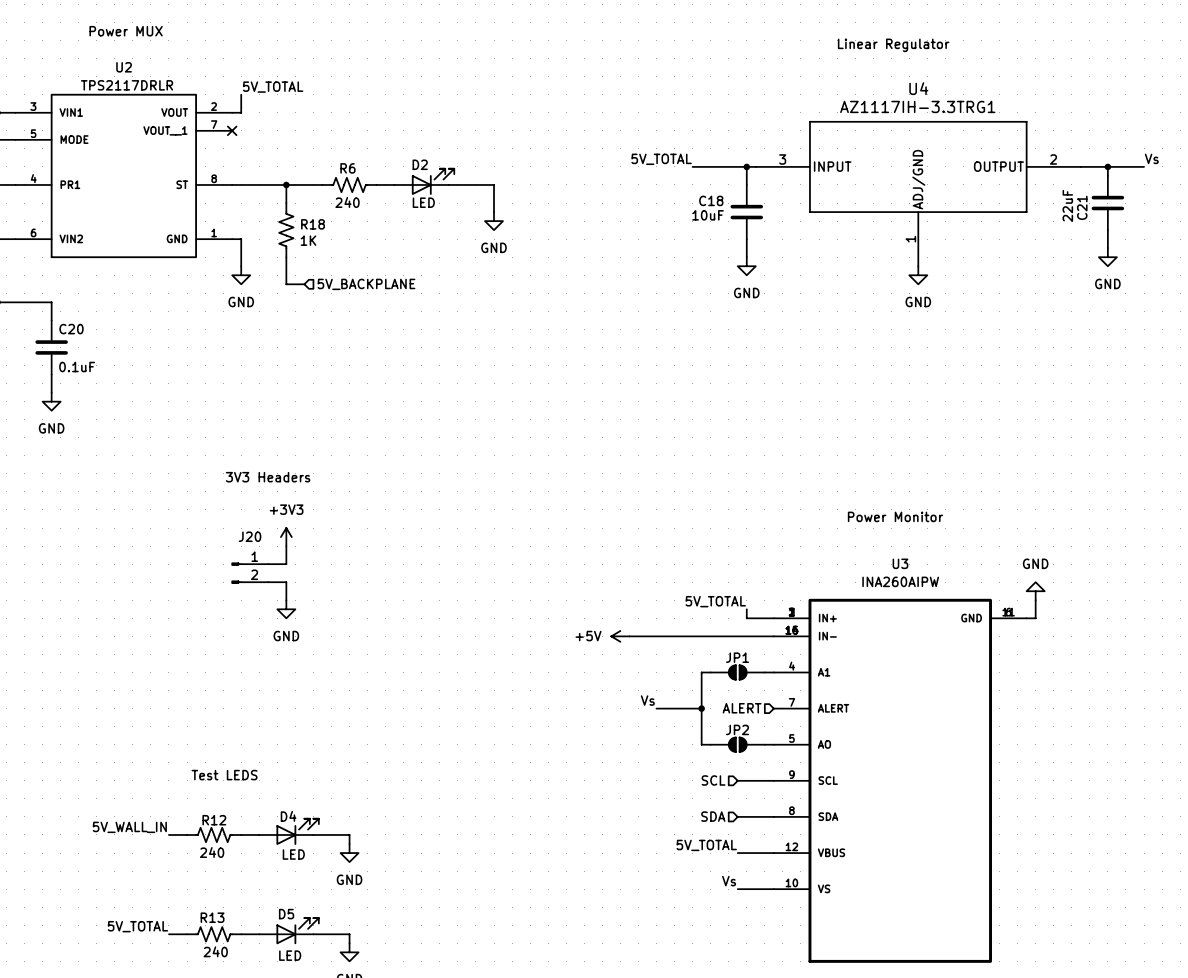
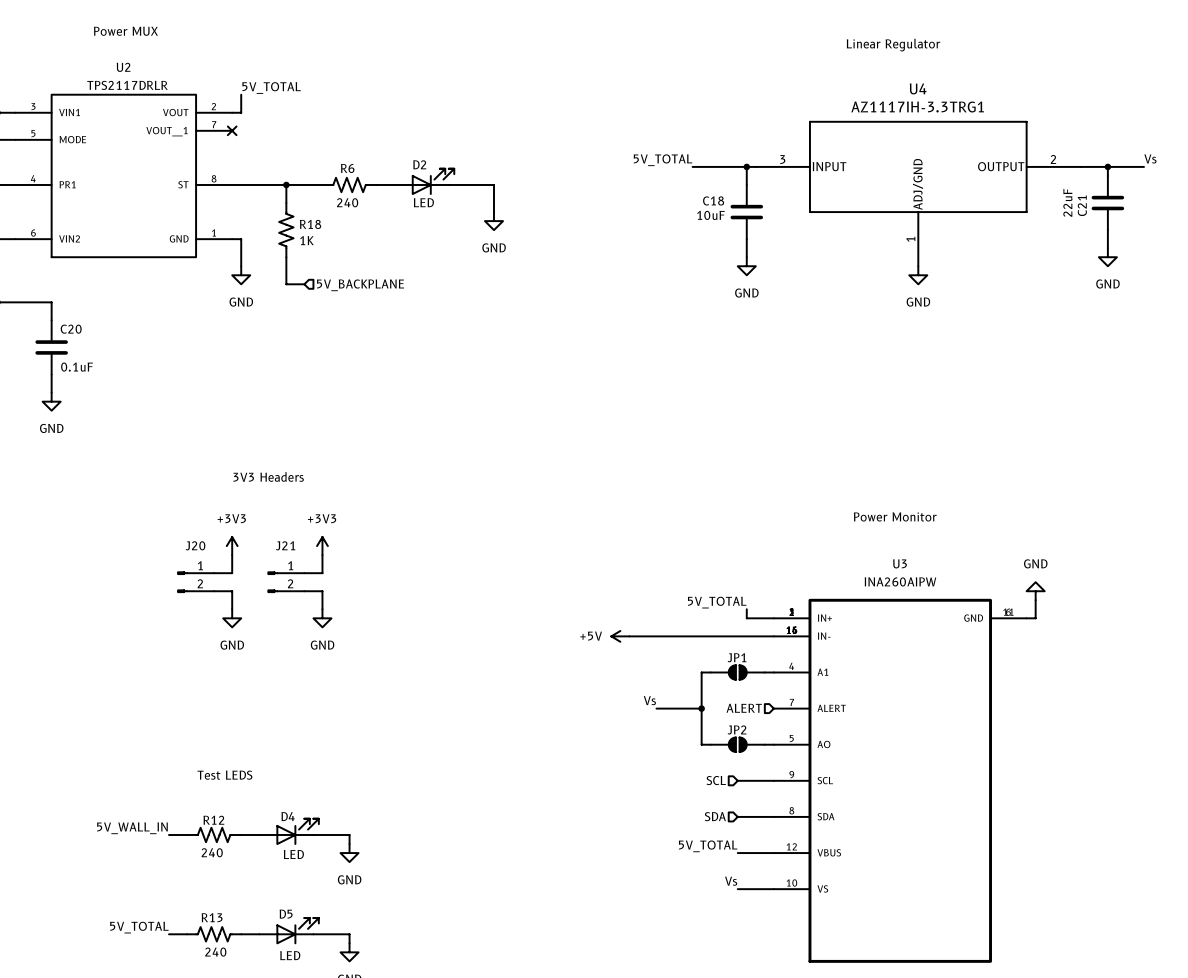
power symbol: +3V3 (286, 537) -> none
power symbol: none -> +3V3 (232, 546)
wire: (286, 546) (286, 564) (268, 564) -> (322, 555) (322, 573) (304, 573)
power symbol: none -> +3V3 (322, 546)
wire: none -> (232, 555) (232, 573) (214, 573)
J20 position: (249, 573) -> (195, 582)
wire: (268, 582) (286, 582) (286, 600) -> (304, 591) (322, 591) (322, 609)
J21: none -> (286, 582)
wire: none -> (214, 591) (232, 591) (232, 609)
power symbol: GND (286, 609) -> none
power symbol: none -> GND (232, 618)
power symbol: none -> GND (322, 618)

